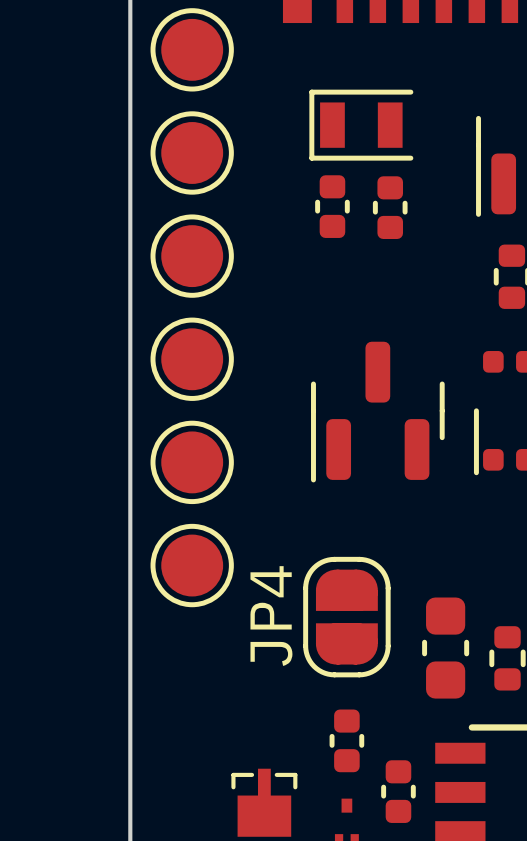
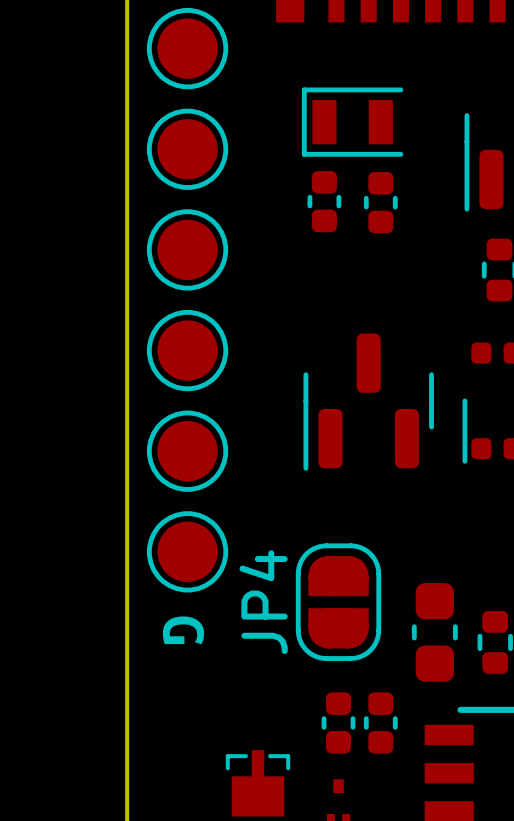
drawing: none -> [162, 616, 205, 645]
part position: (398, 791) -> (380, 722)

